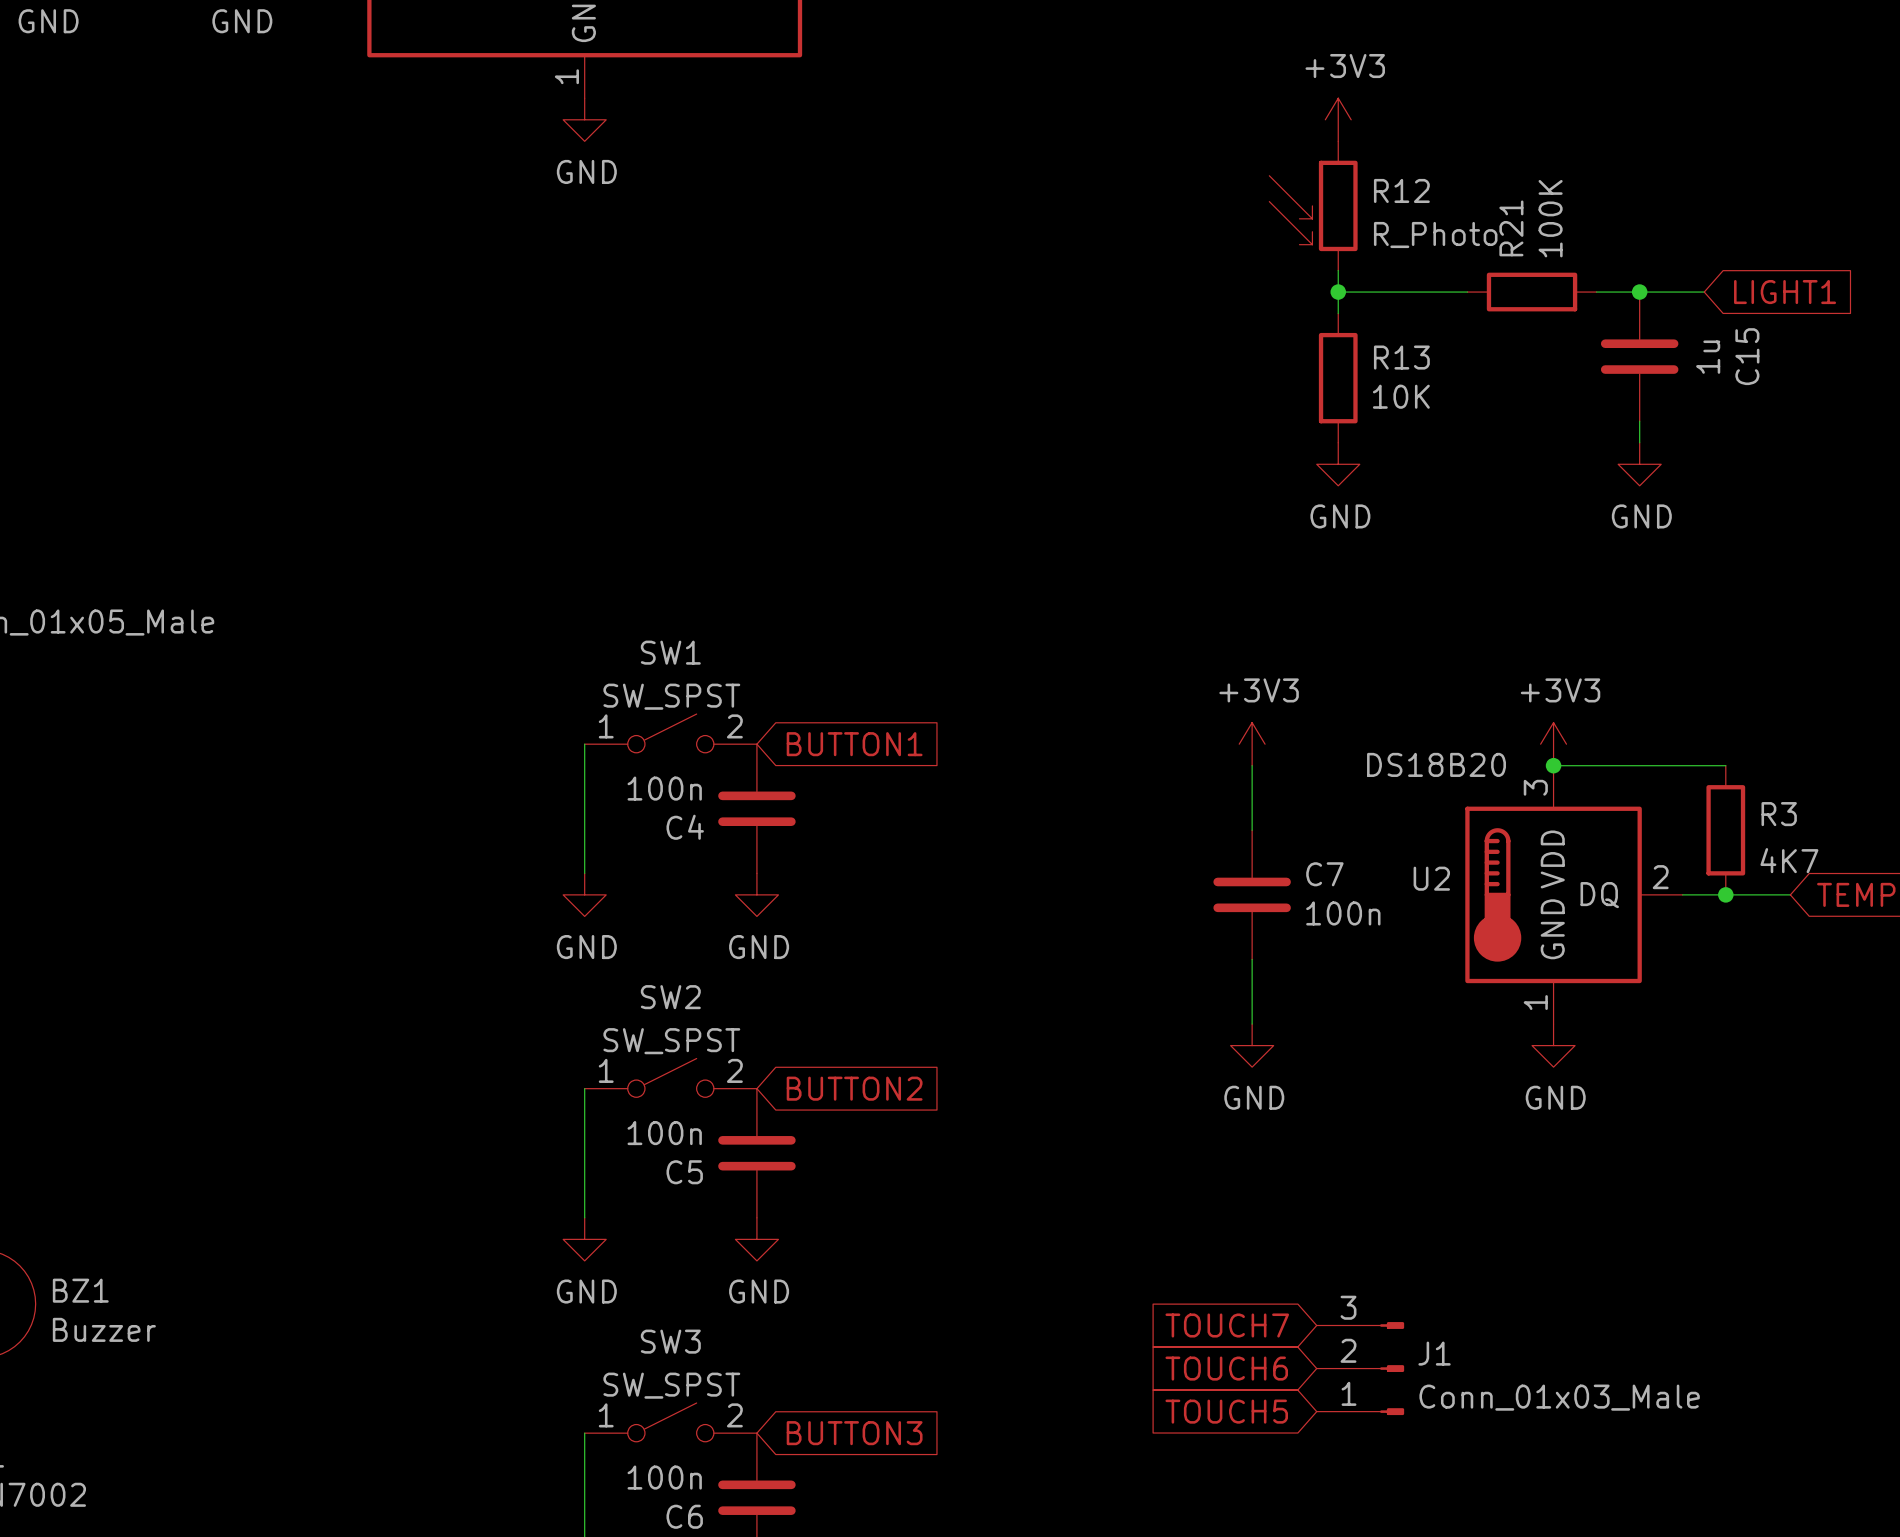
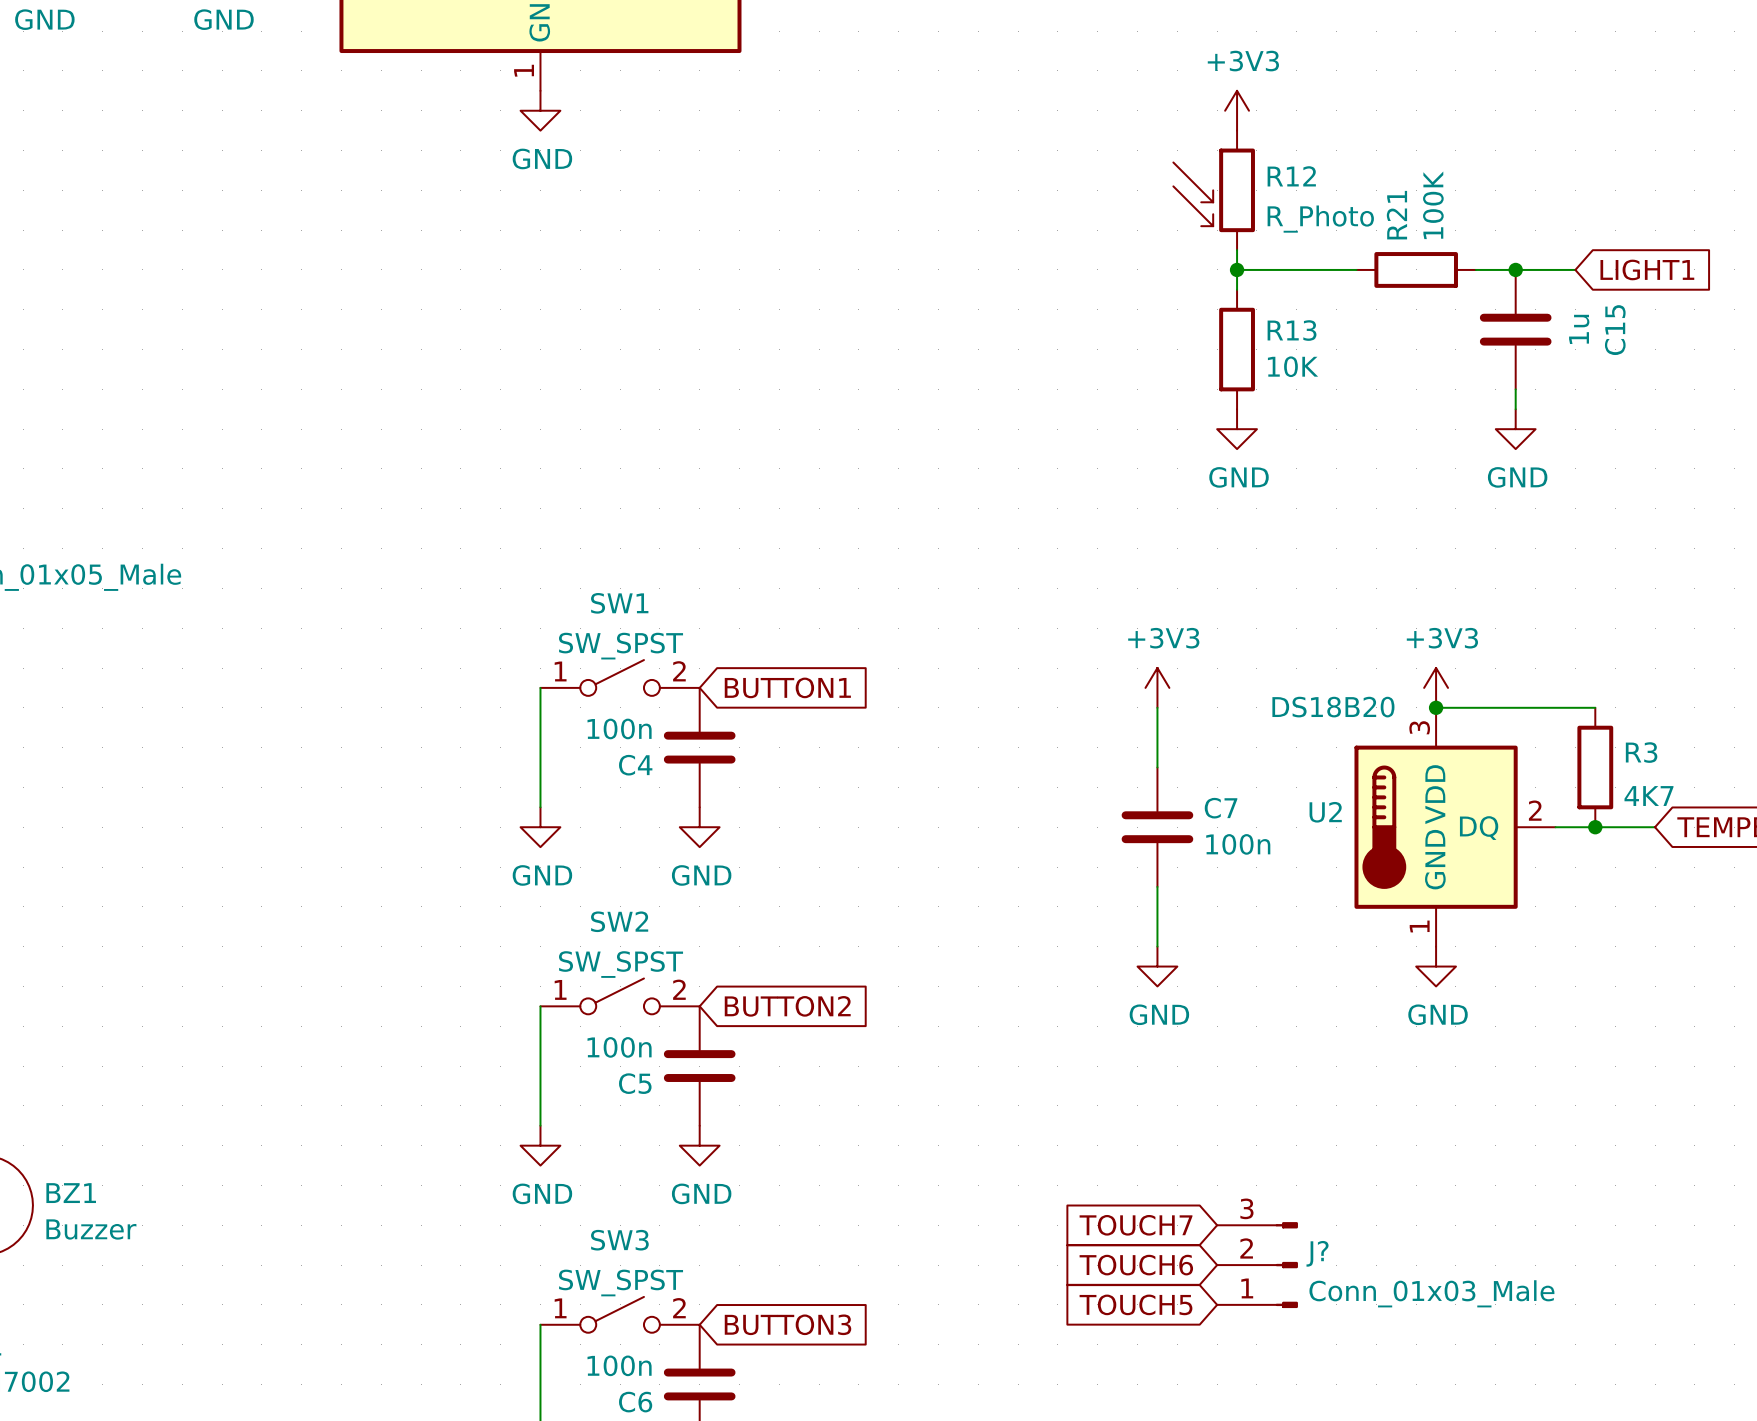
J1 name: J1 (1434, 1353) -> J? (1317, 1253)

